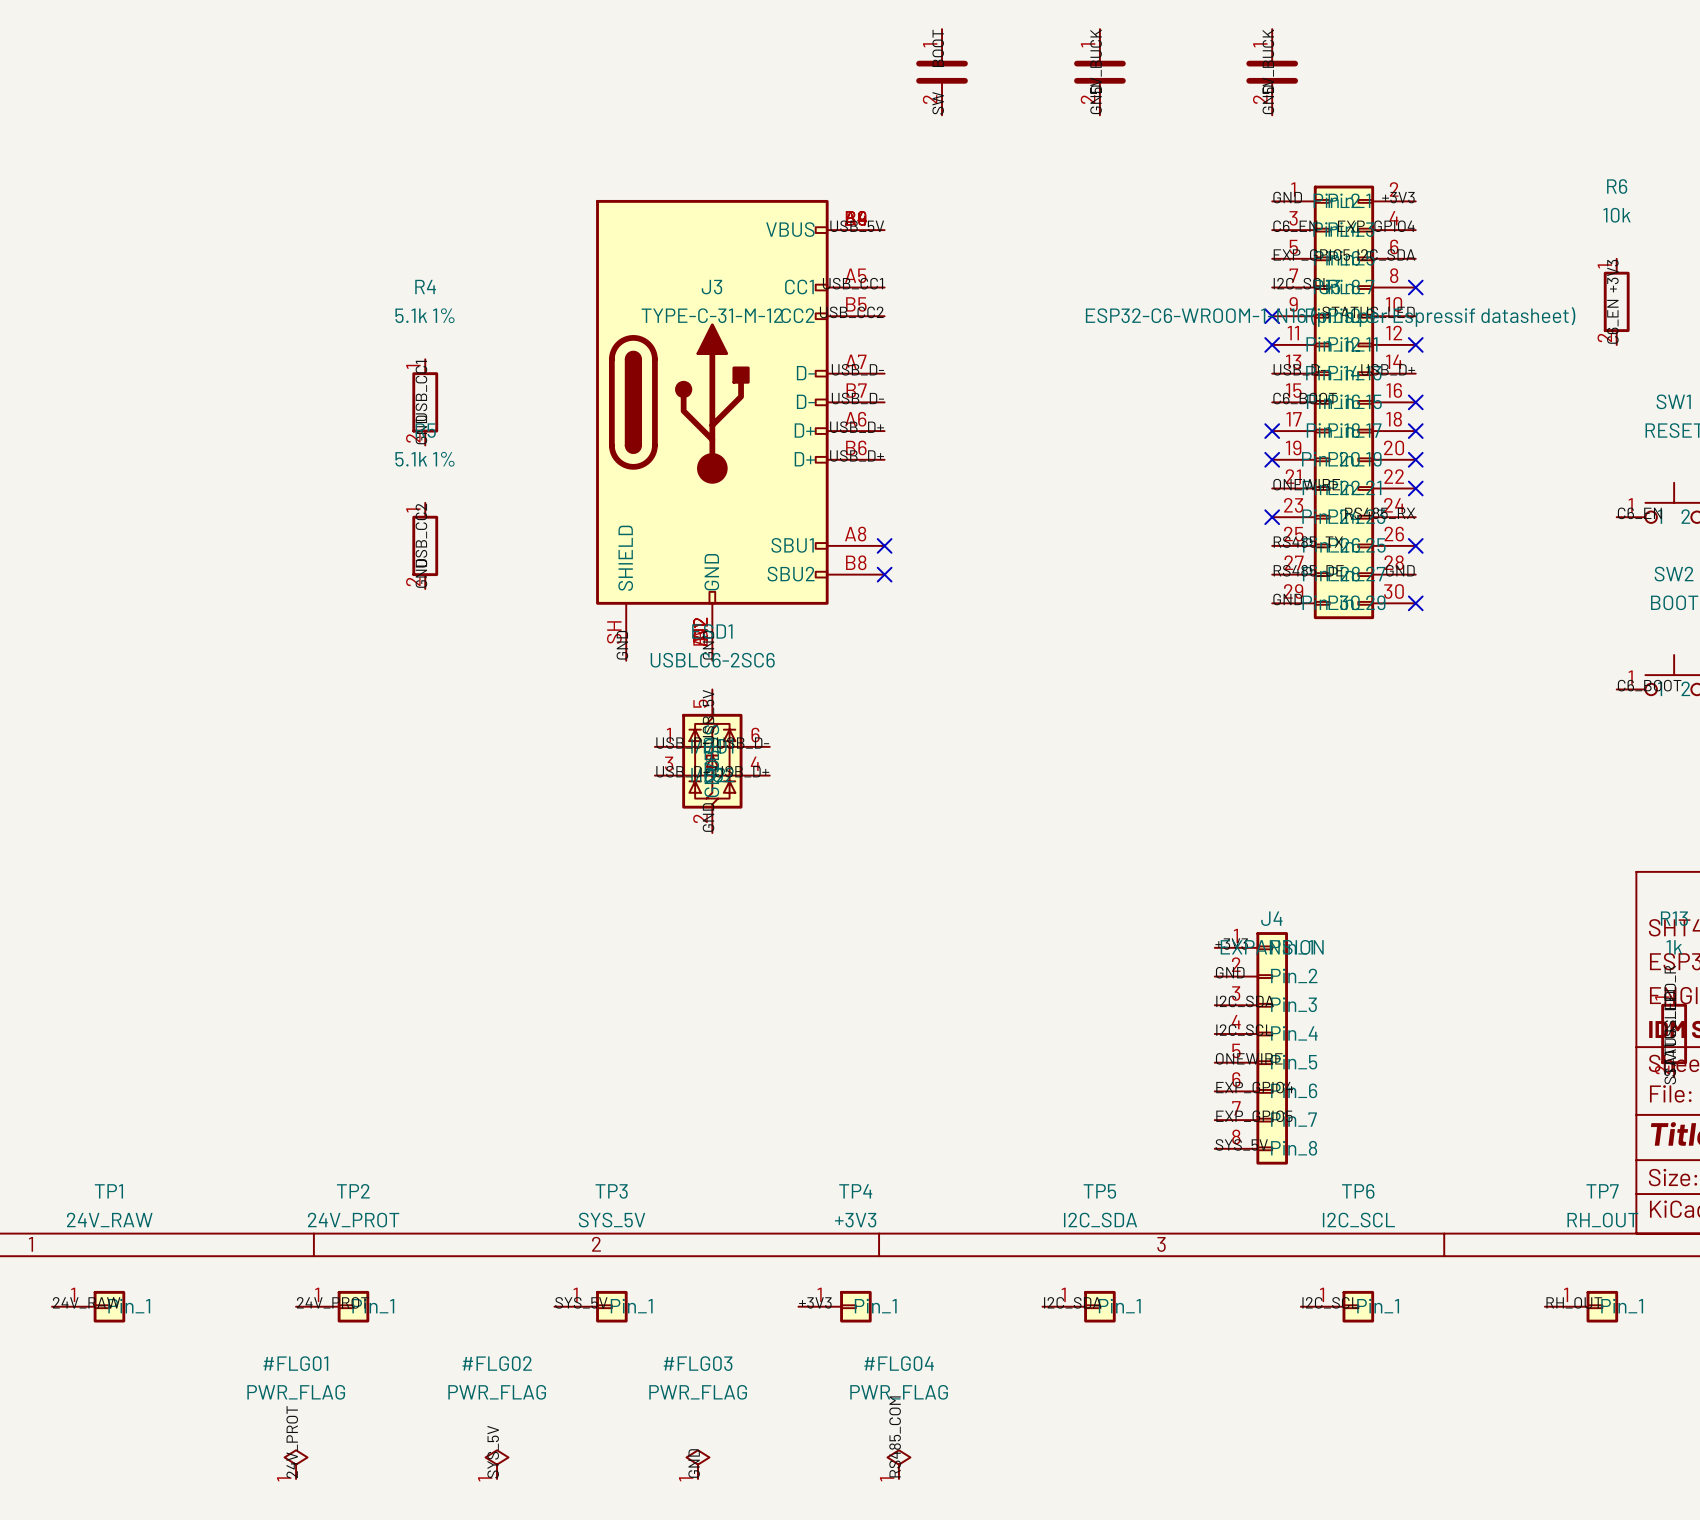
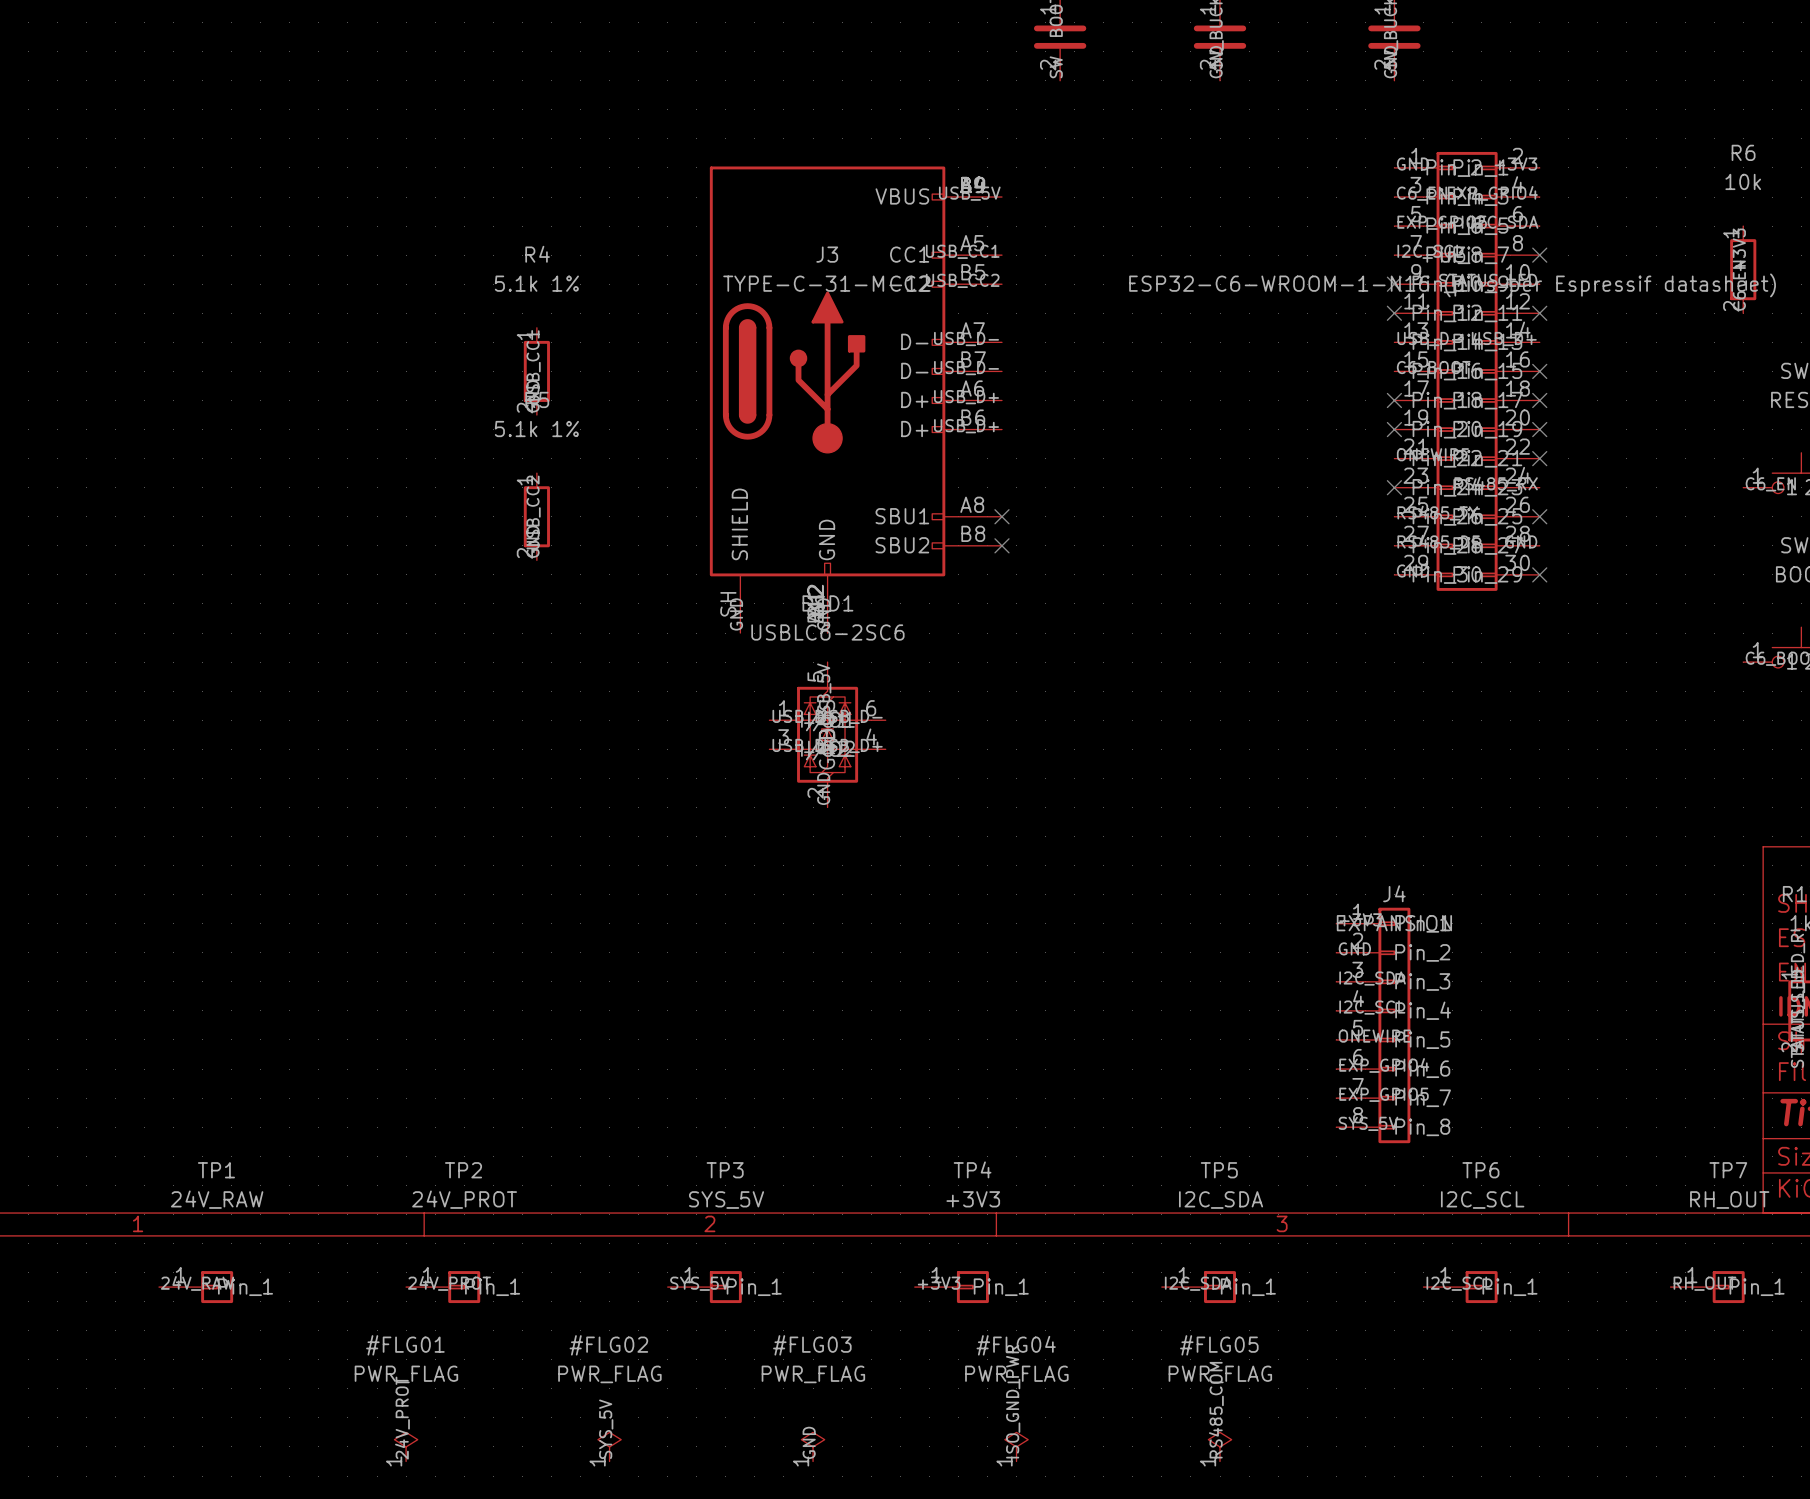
label: RS485_COM (895, 1436) -> ISO_GND_PWR (1013, 1401)
label: none -> RS485_COM (1216, 1410)
#FLG05: none -> PWR_FLAG (1220, 1446)

